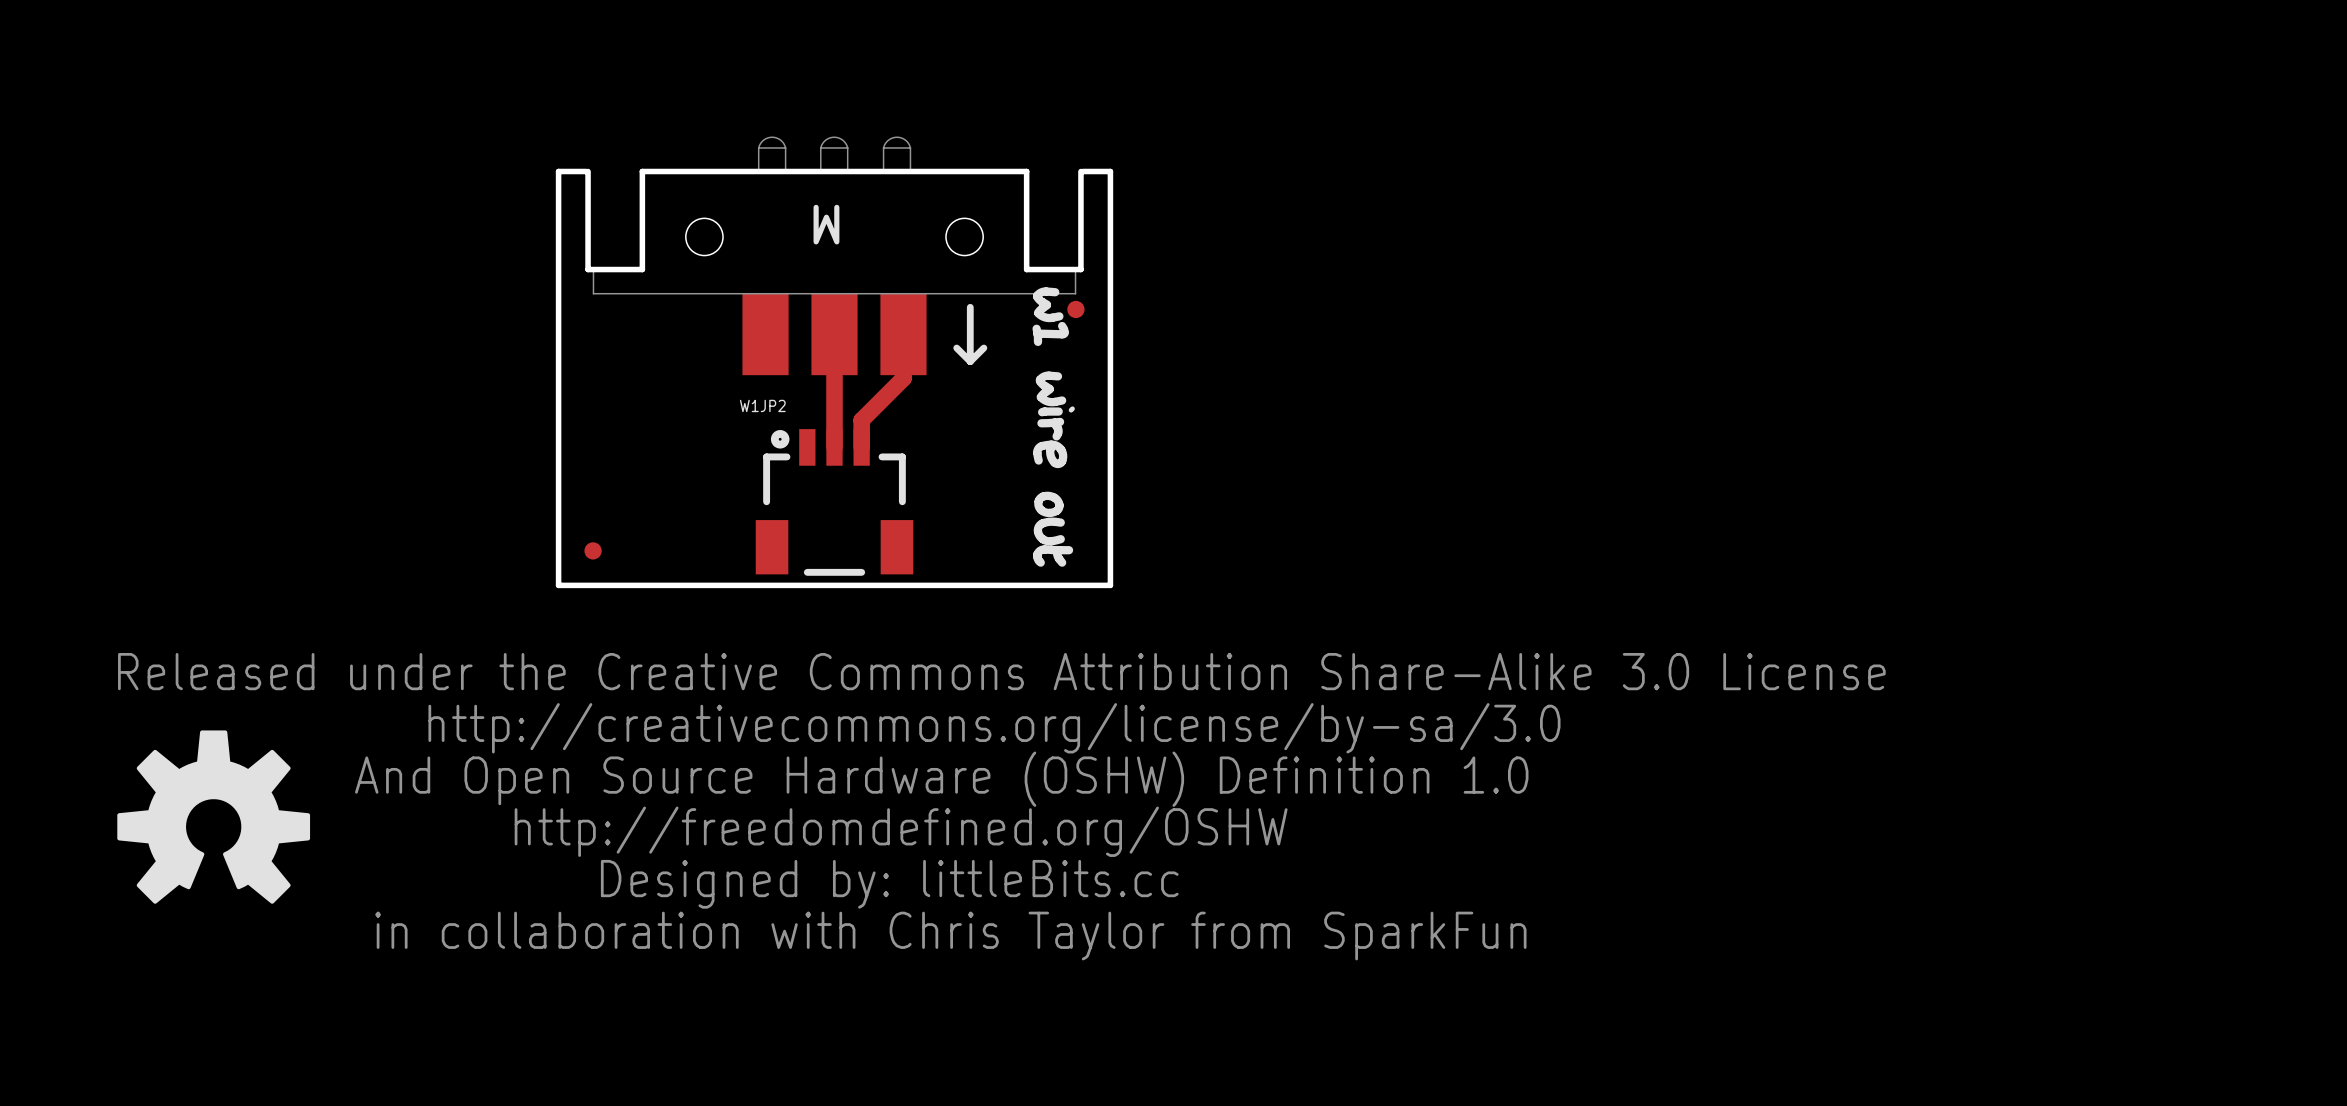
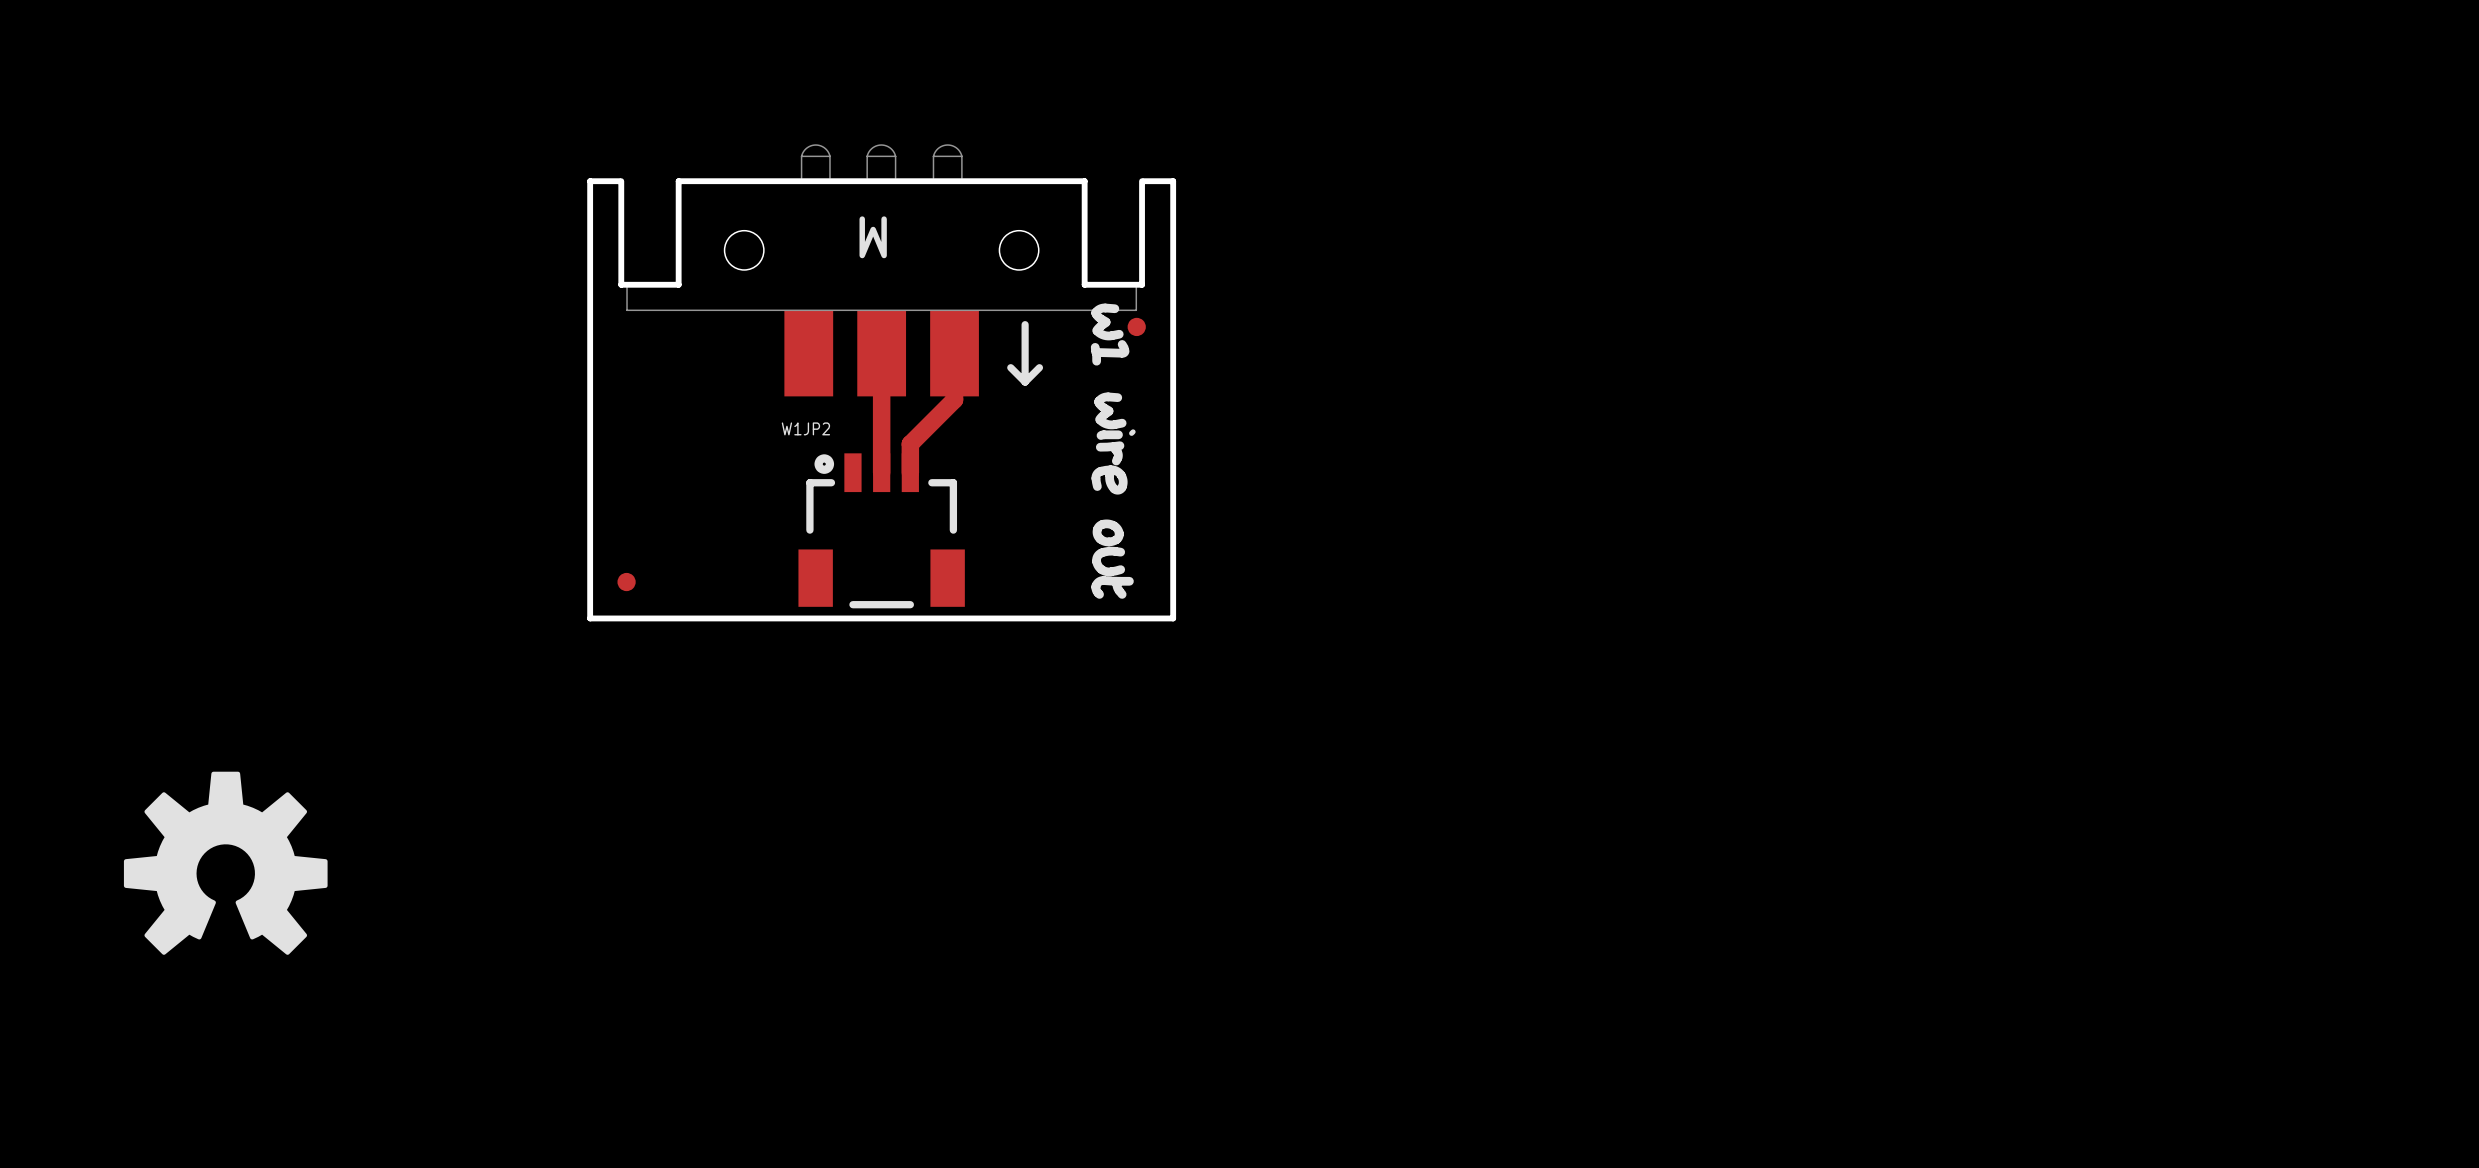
drawing: [118, 652, 1886, 961] -> none

